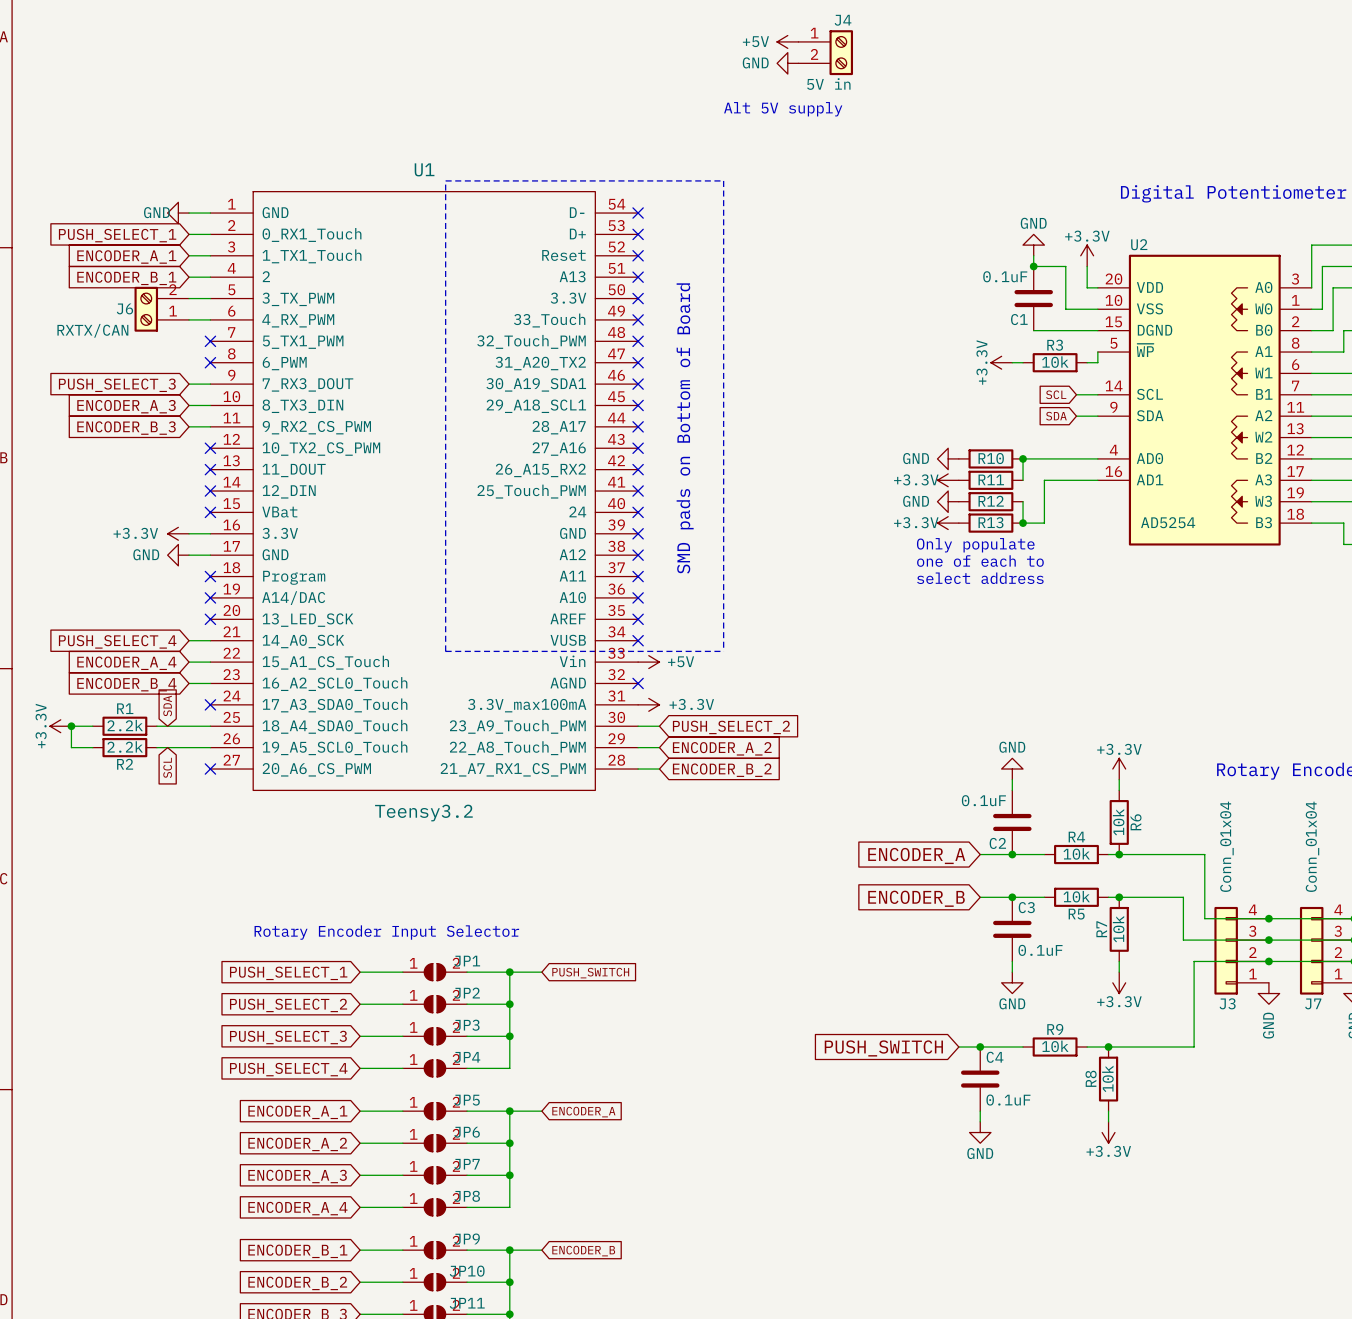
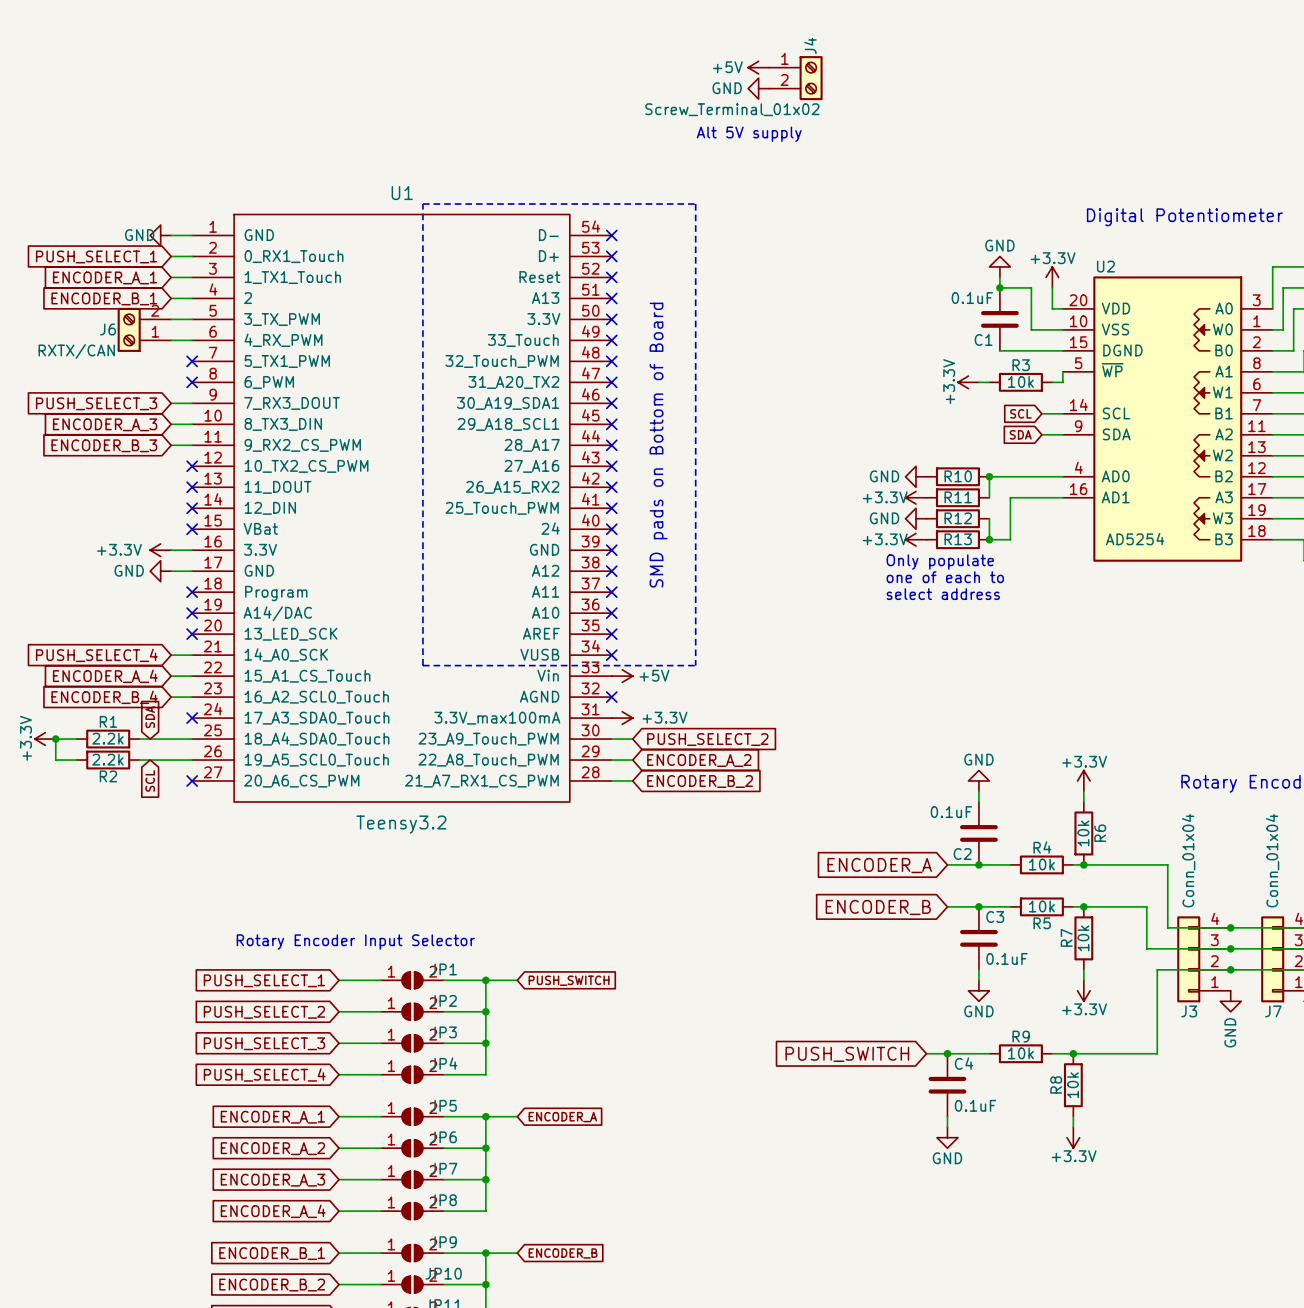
J4 name rotation: 0° (843, 20) -> 90° counterclockwise (810, 45)
J4 value: 5V in (828, 84) -> Screw_Terminal_01x02 (732, 109)

